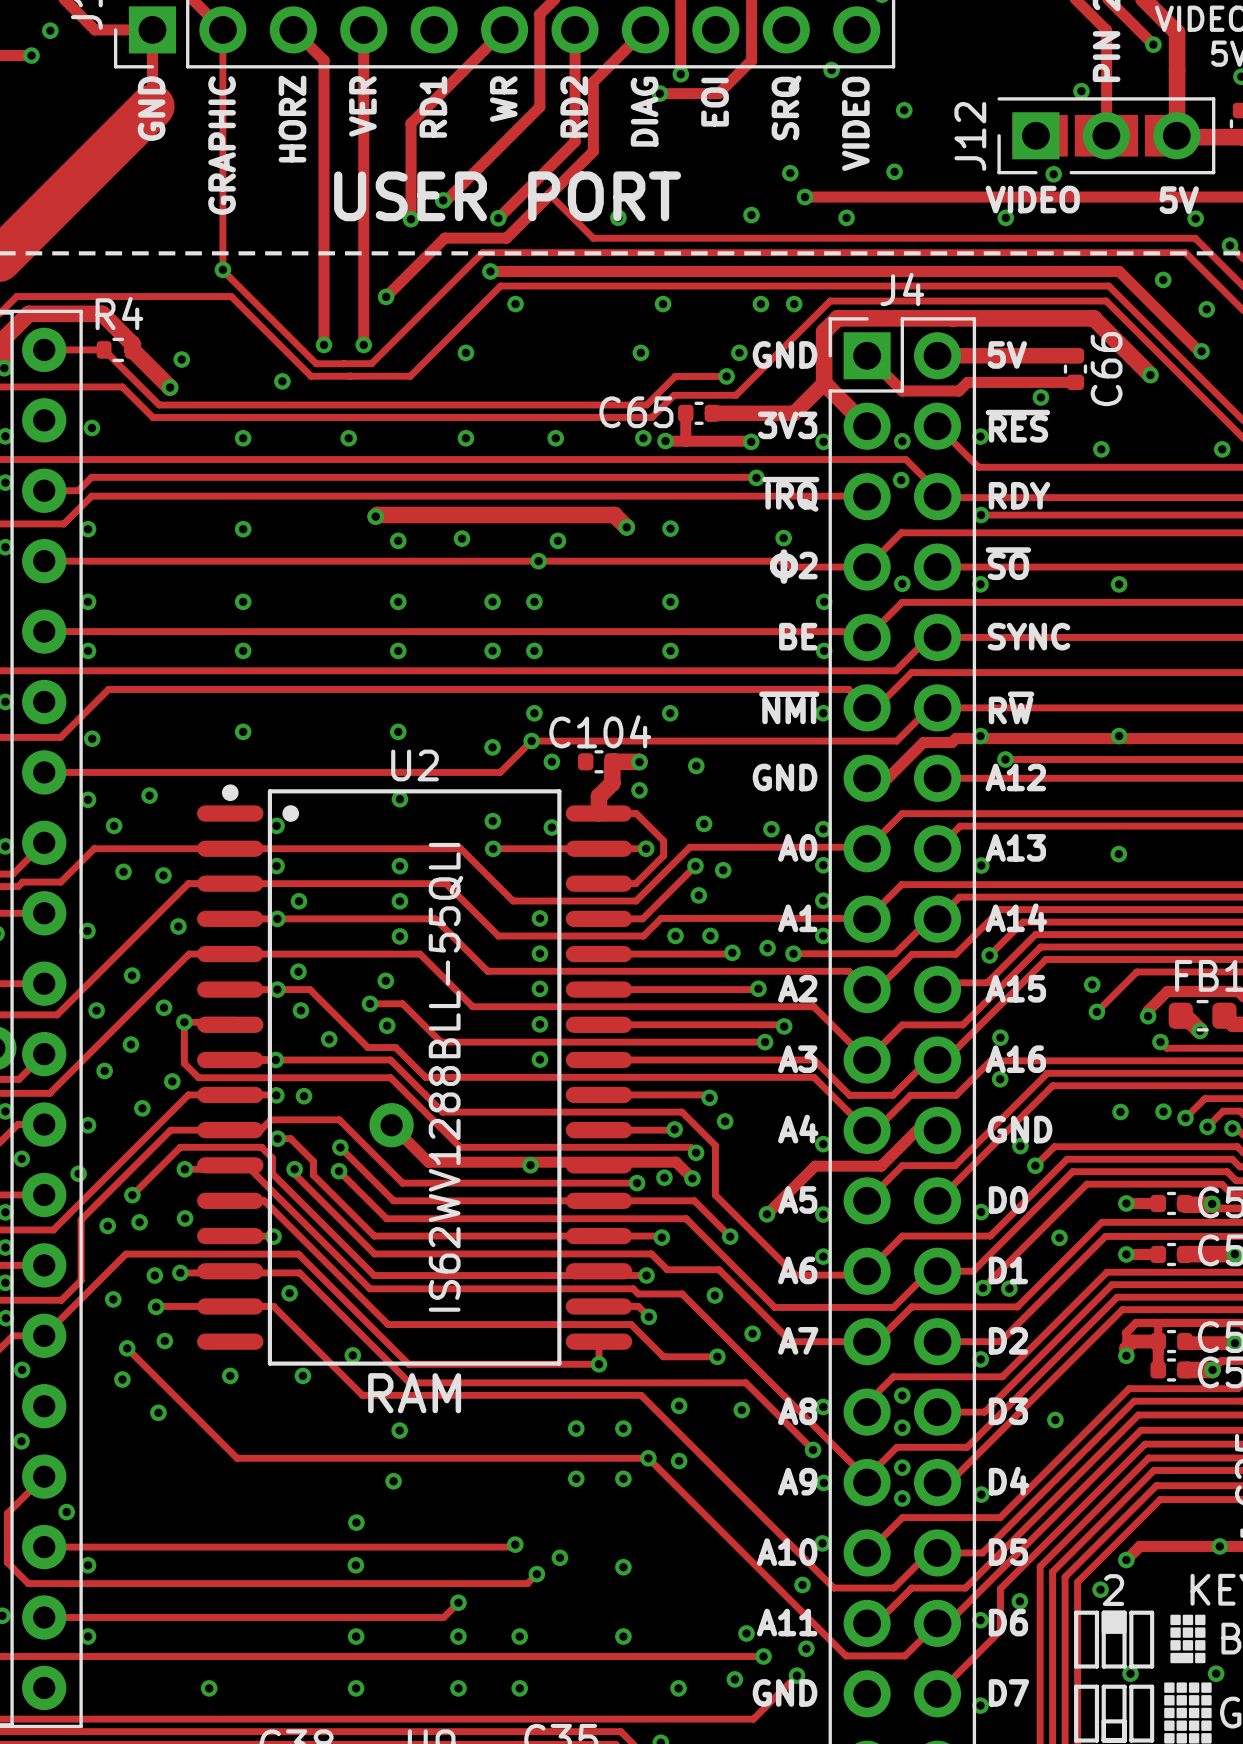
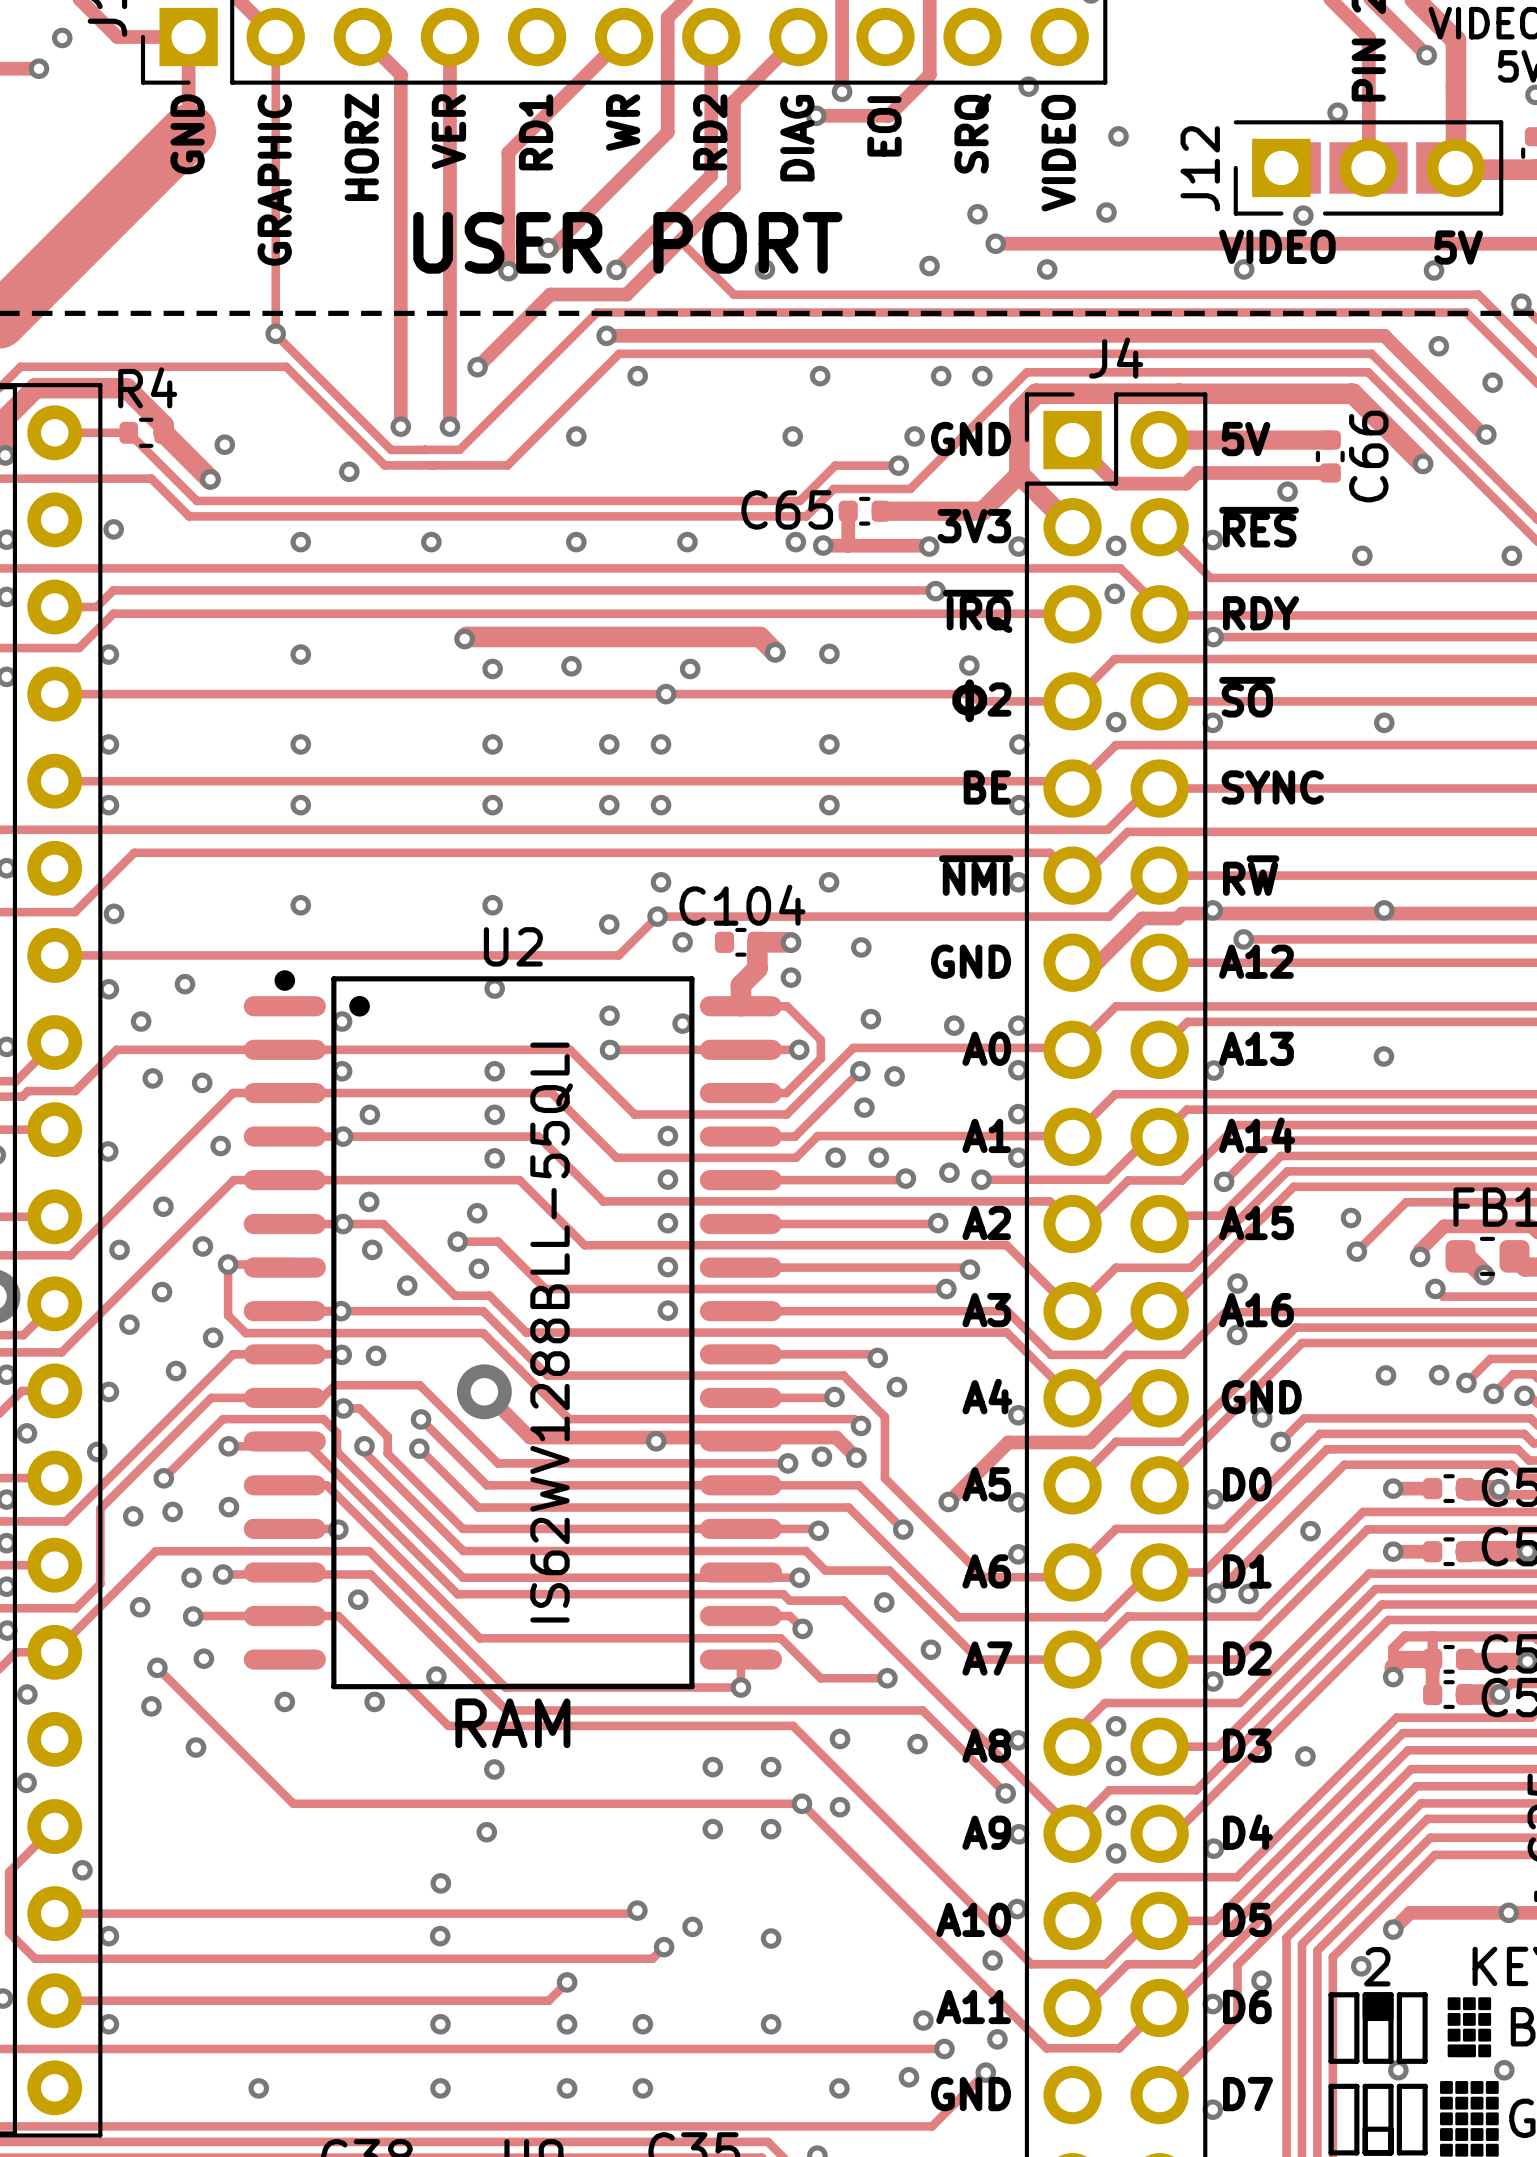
via position: (1195, 218) -> (1434, 270)

